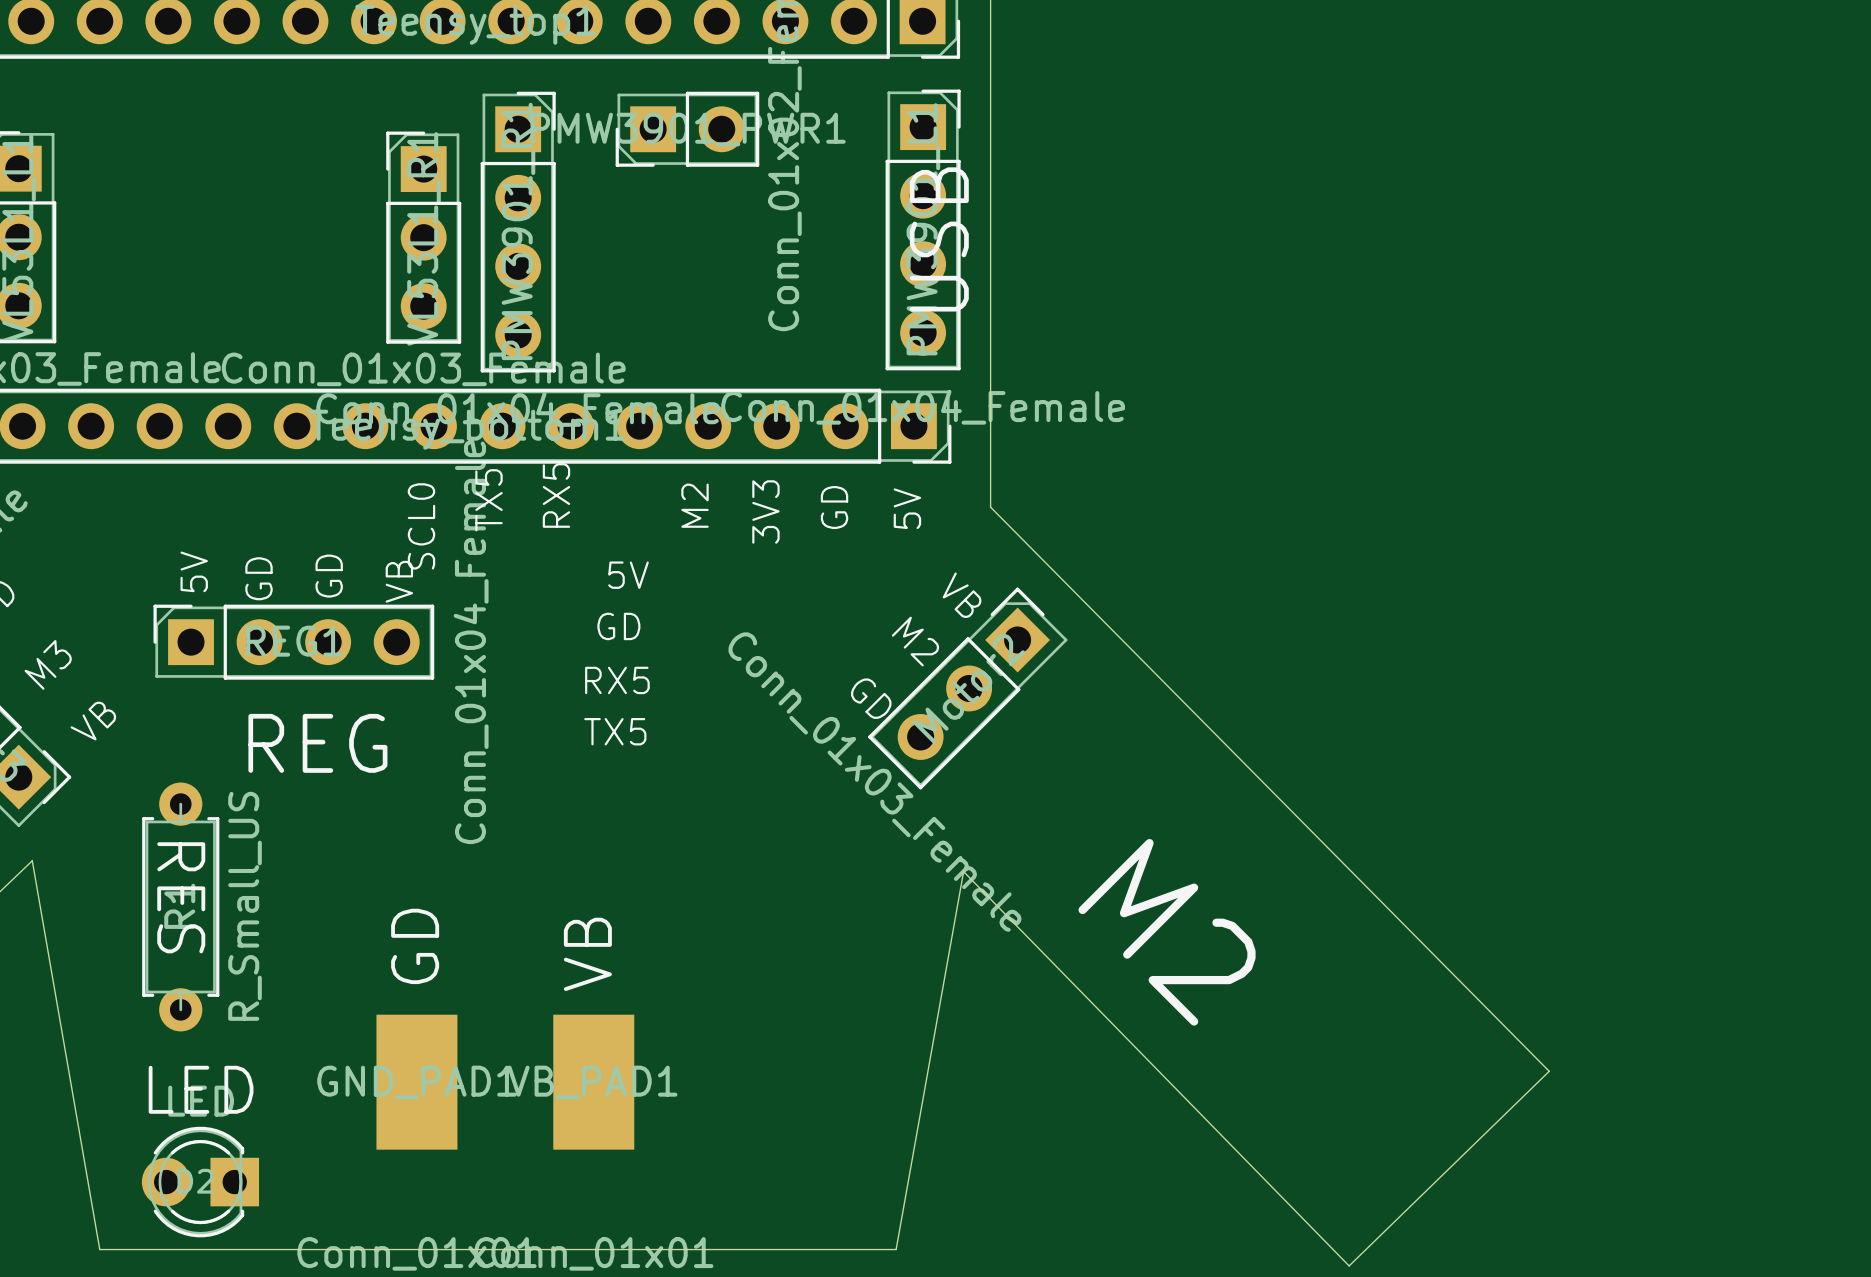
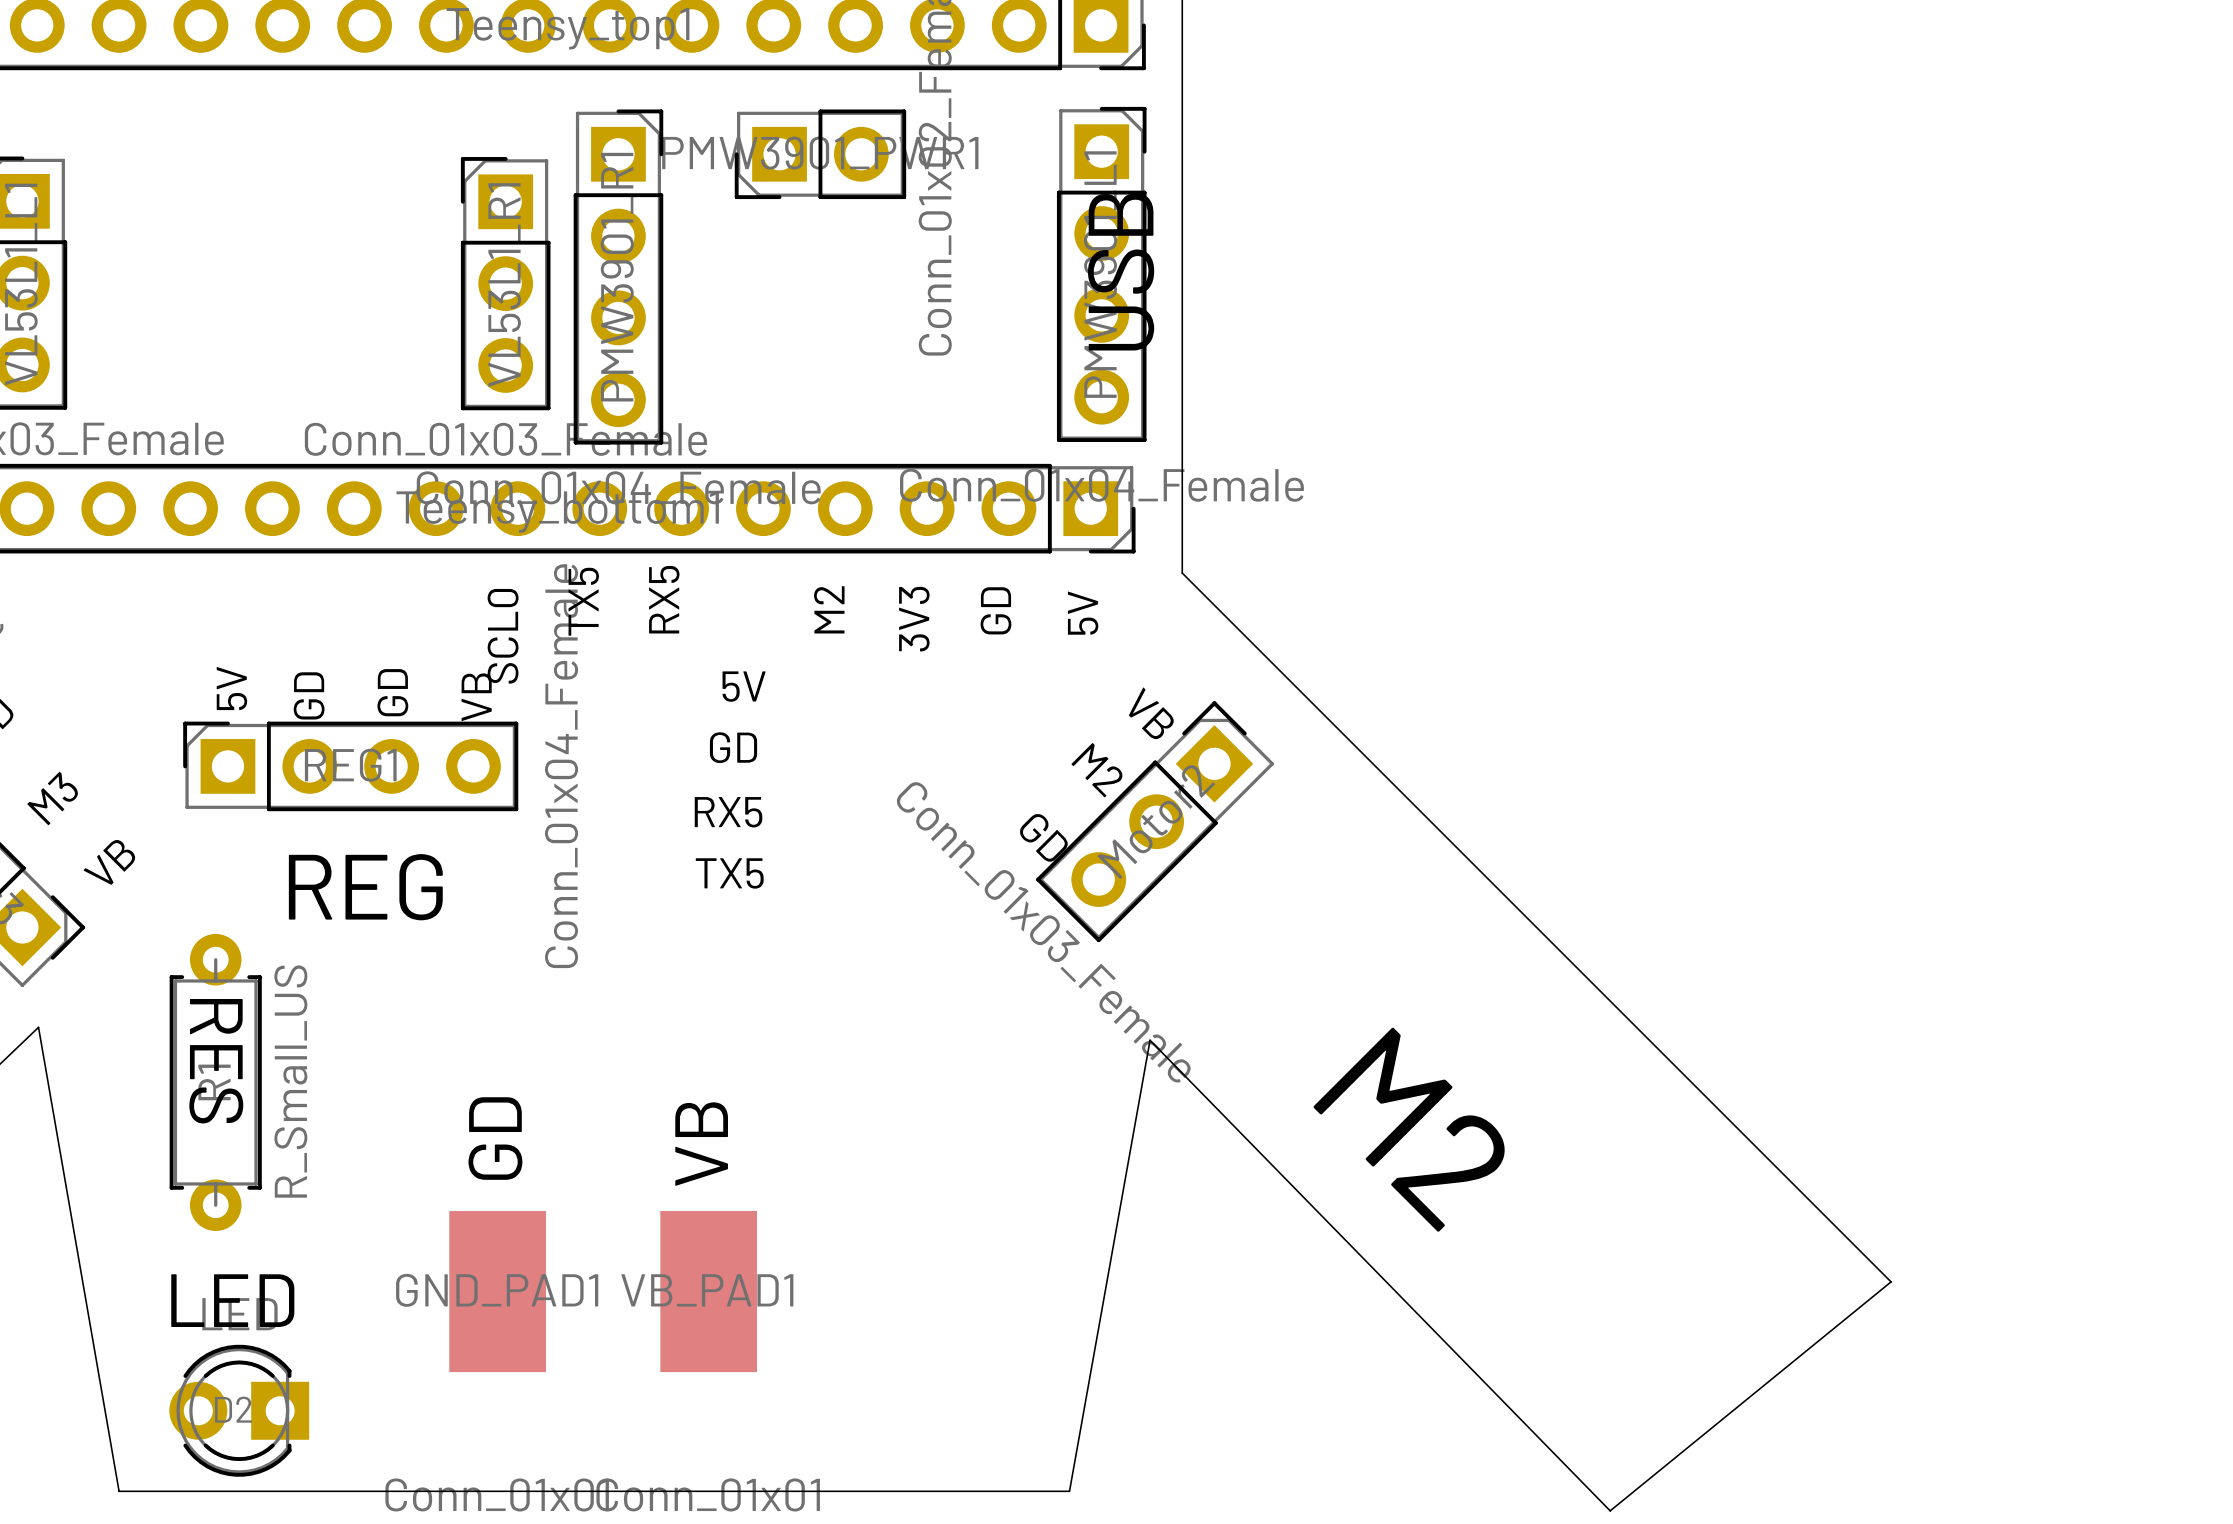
board edge: (990, 480) (990, 507) (1549, 1071) (1349, 1265) -> (1182, 573) (1891, 1281) (1610, 1510)

